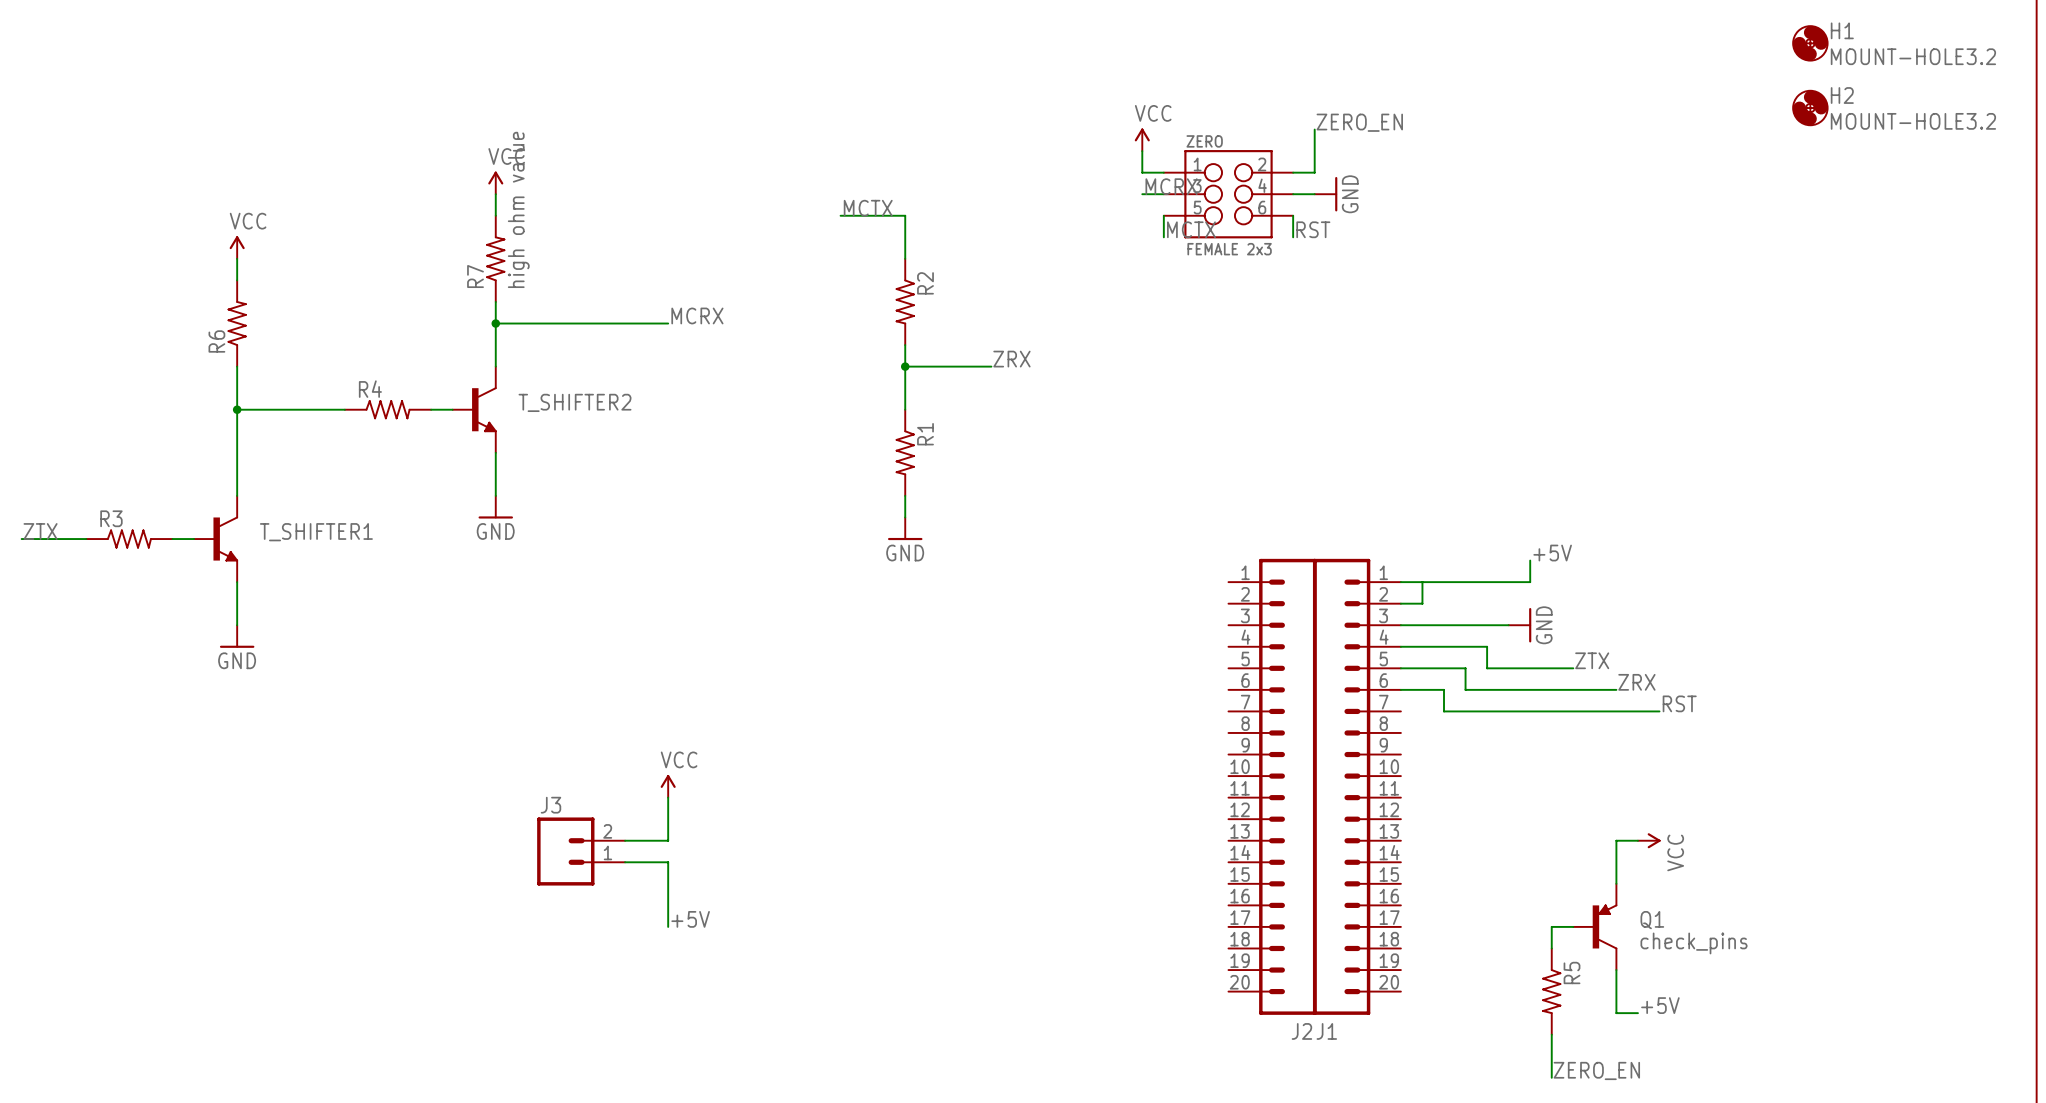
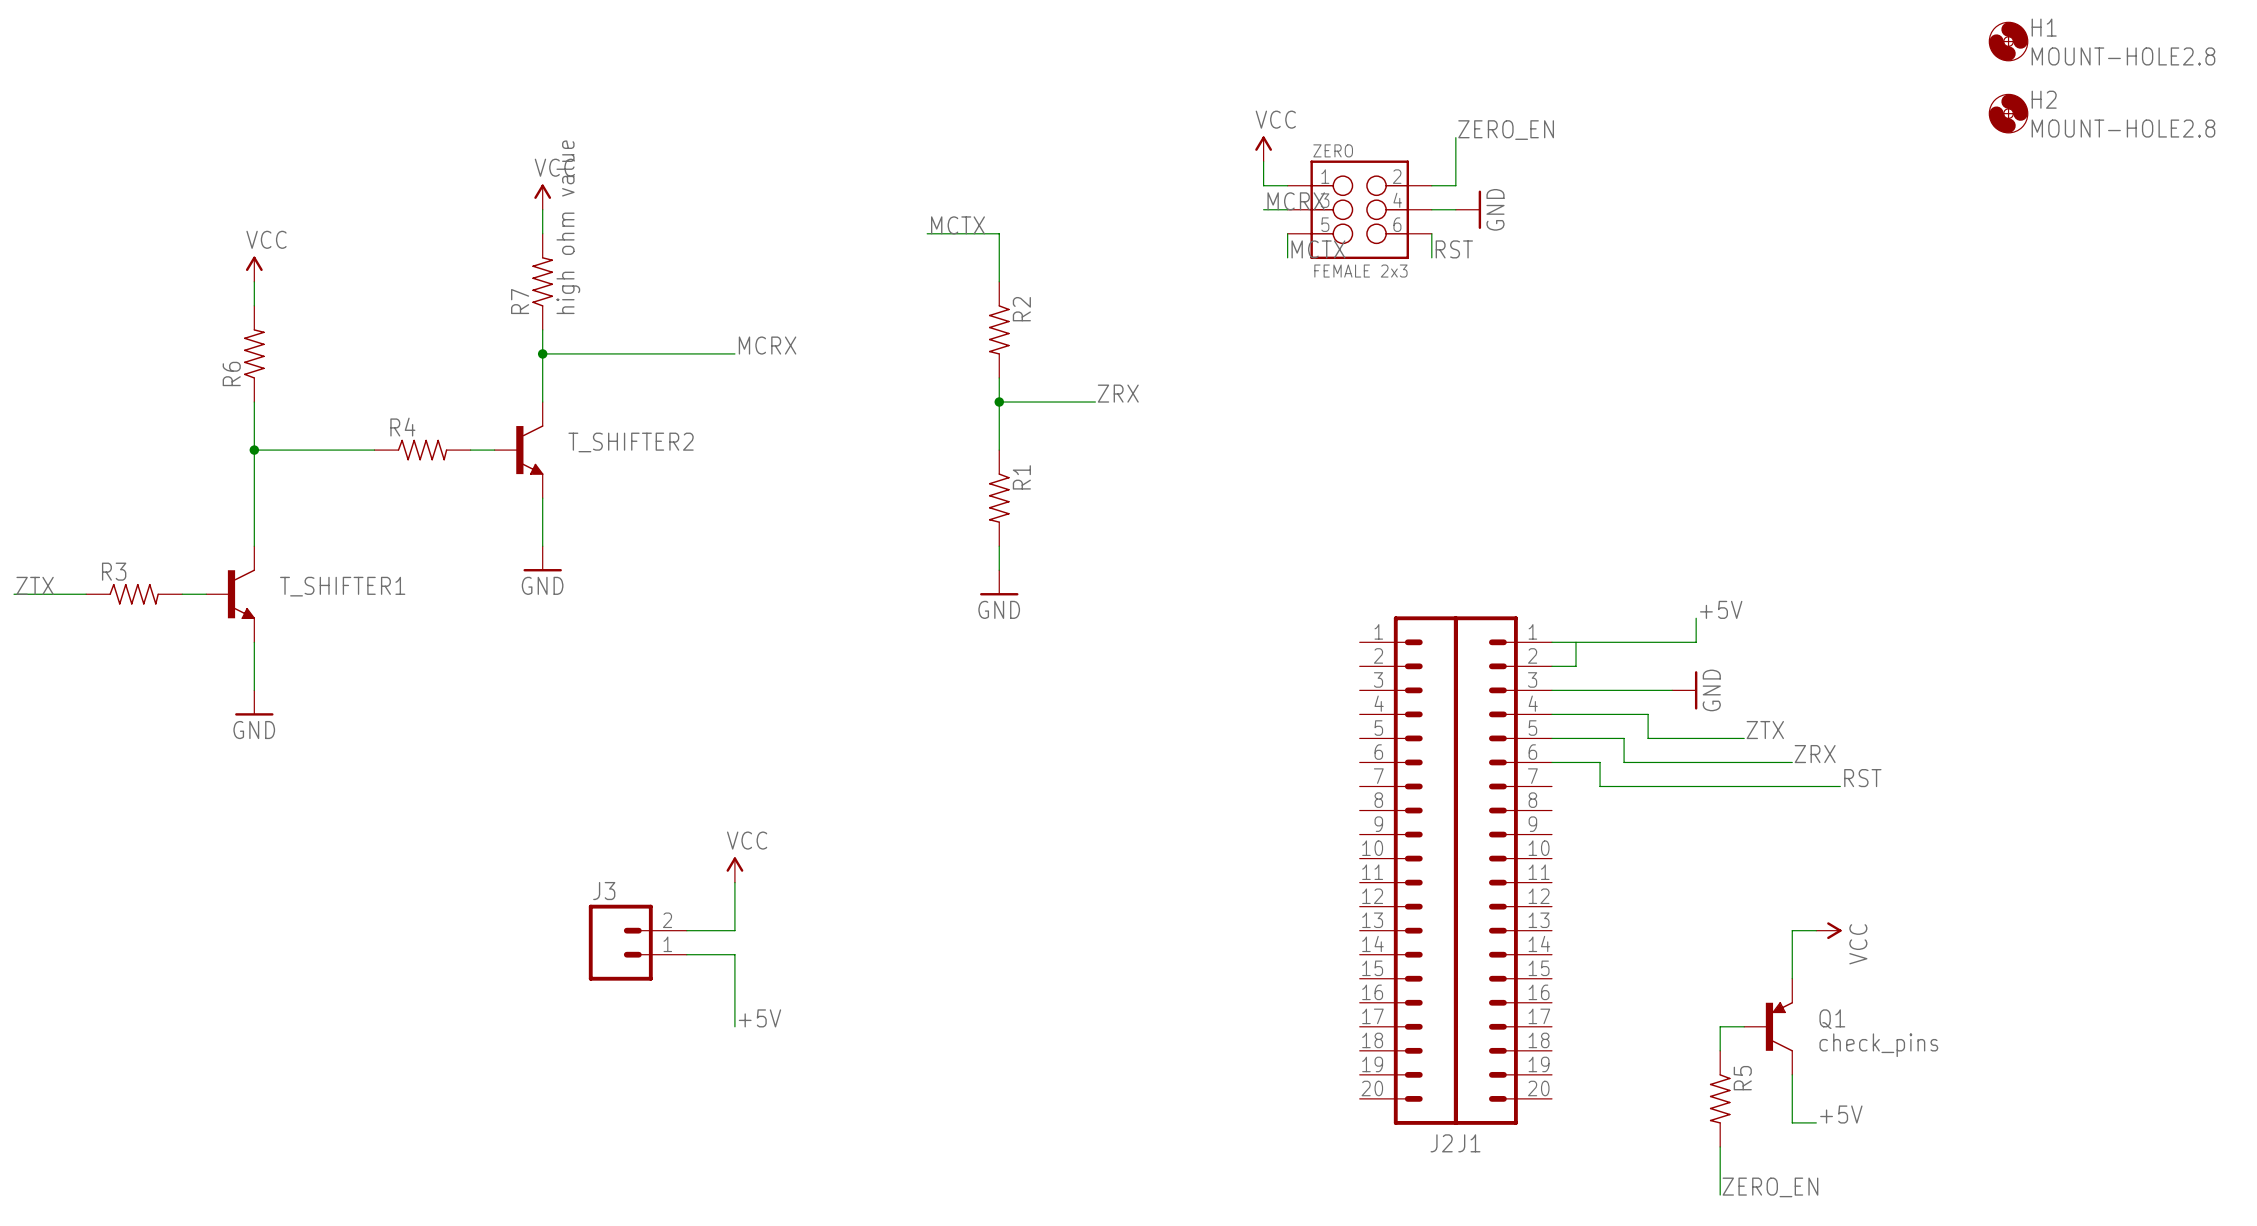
H1 value: MOUNT-HOLE3.2 (1913, 56) -> MOUNT-HOLE2.8 (2123, 56)
H2 value: MOUNT-HOLE3.2 (1913, 121) -> MOUNT-HOLE2.8 (2123, 128)

